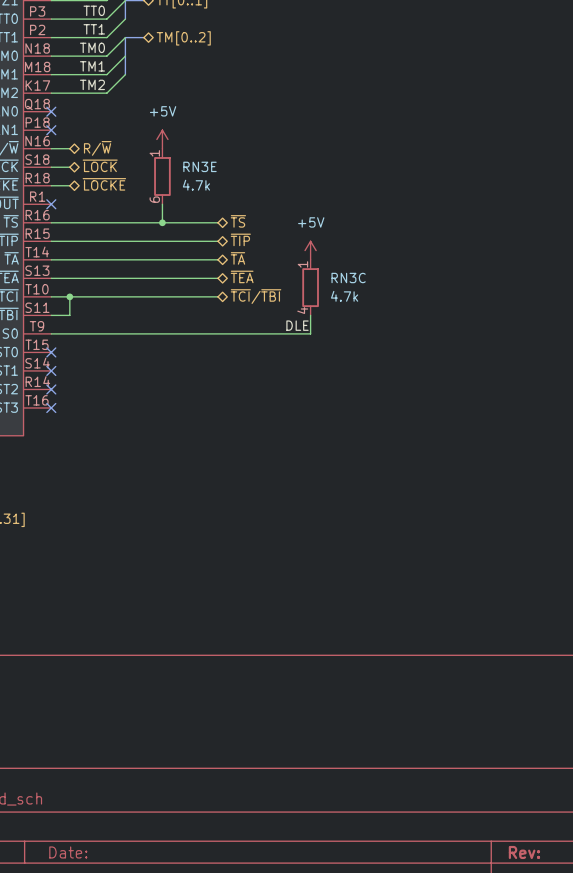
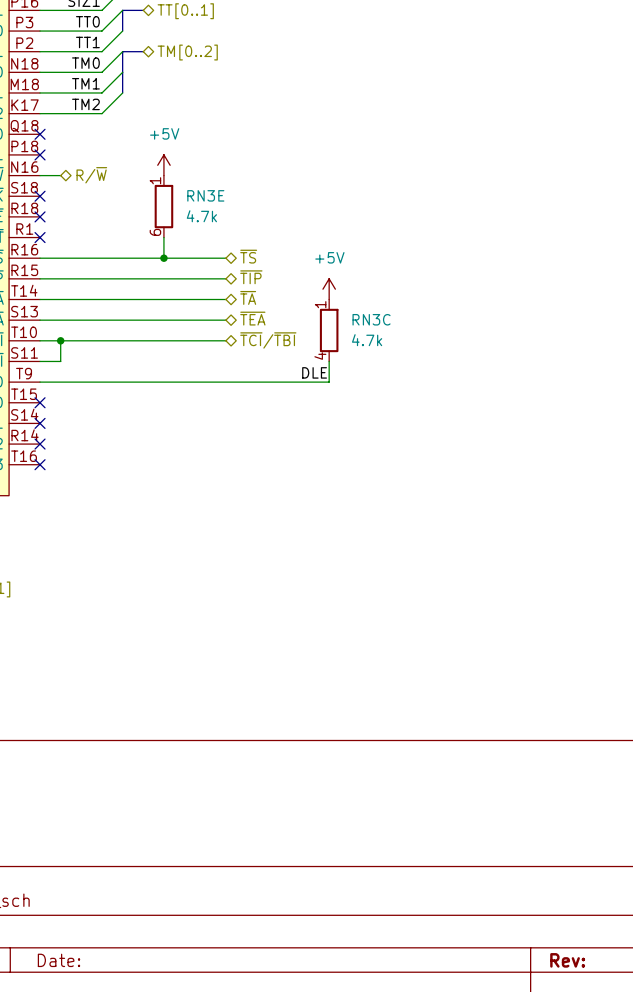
hierarchical label: ~{LOCK} (100, 165) -> none
wire: (51, 167) (69, 167) -> none
no-connect mark: none -> (40, 196)
hierarchical label: ~{LOCKE} (104, 184) -> none
wire: (51, 185) (69, 185) -> none
no-connect mark: none -> (40, 216)

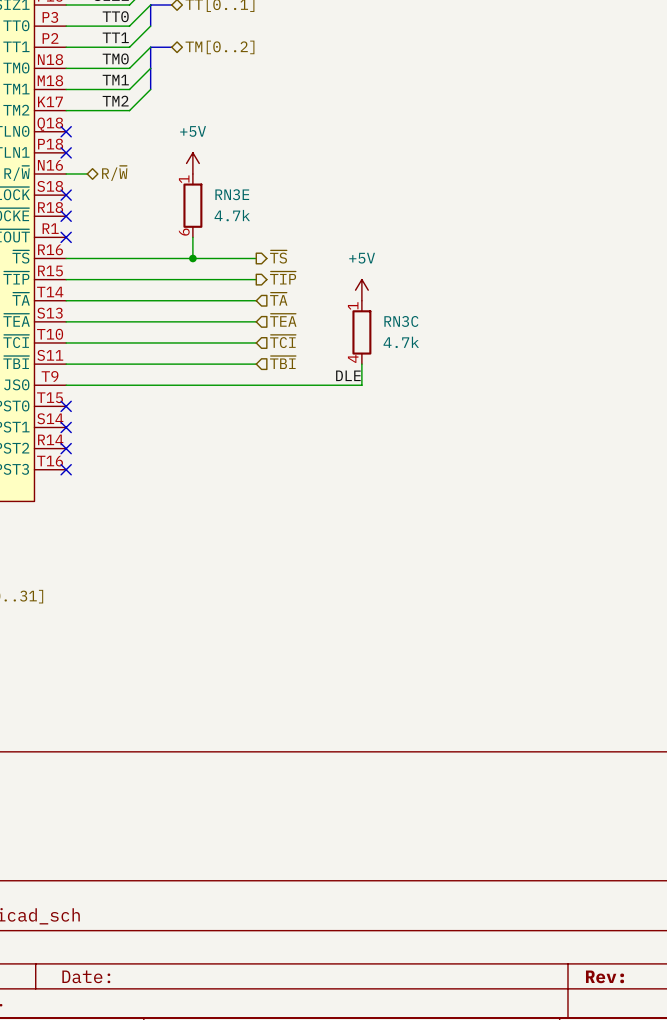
hierarchical label shape: bidirectional (248, 256) -> output (278, 256)
hierarchical label shape: bidirectional (251, 277) -> output (283, 278)
hierarchical label shape: bidirectional (248, 297) -> input (278, 299)
hierarchical label shape: bidirectional (252, 318) -> input (283, 320)
wire: (60, 340) (60, 361) -> (256, 364) (87, 364)
junction: (60, 340) -> none
hierarchical label shape: bidirectional (268, 340) -> input (282, 341)
hierarchical label: ~{TCI}/~{TBI} (268, 340) -> ~{TCI} (282, 341)
hierarchical label: none -> ~{TBI} (282, 362)

